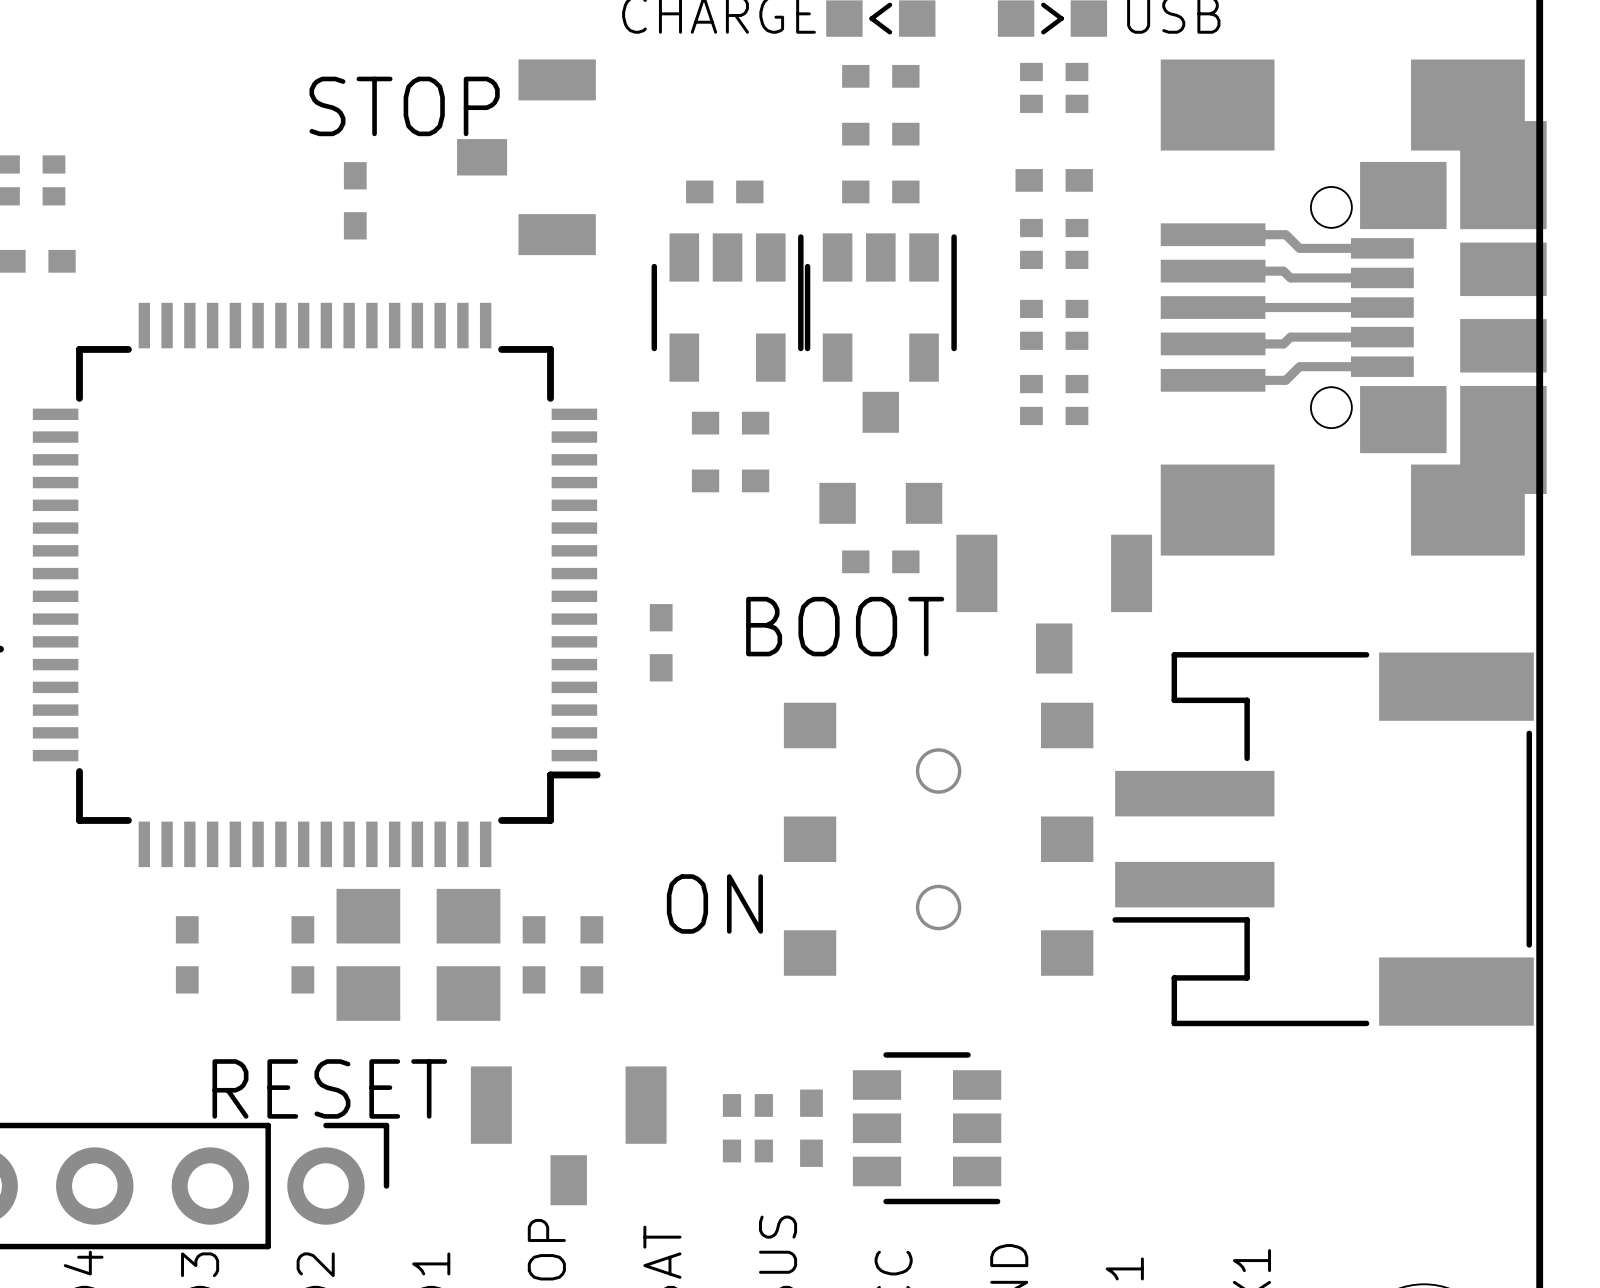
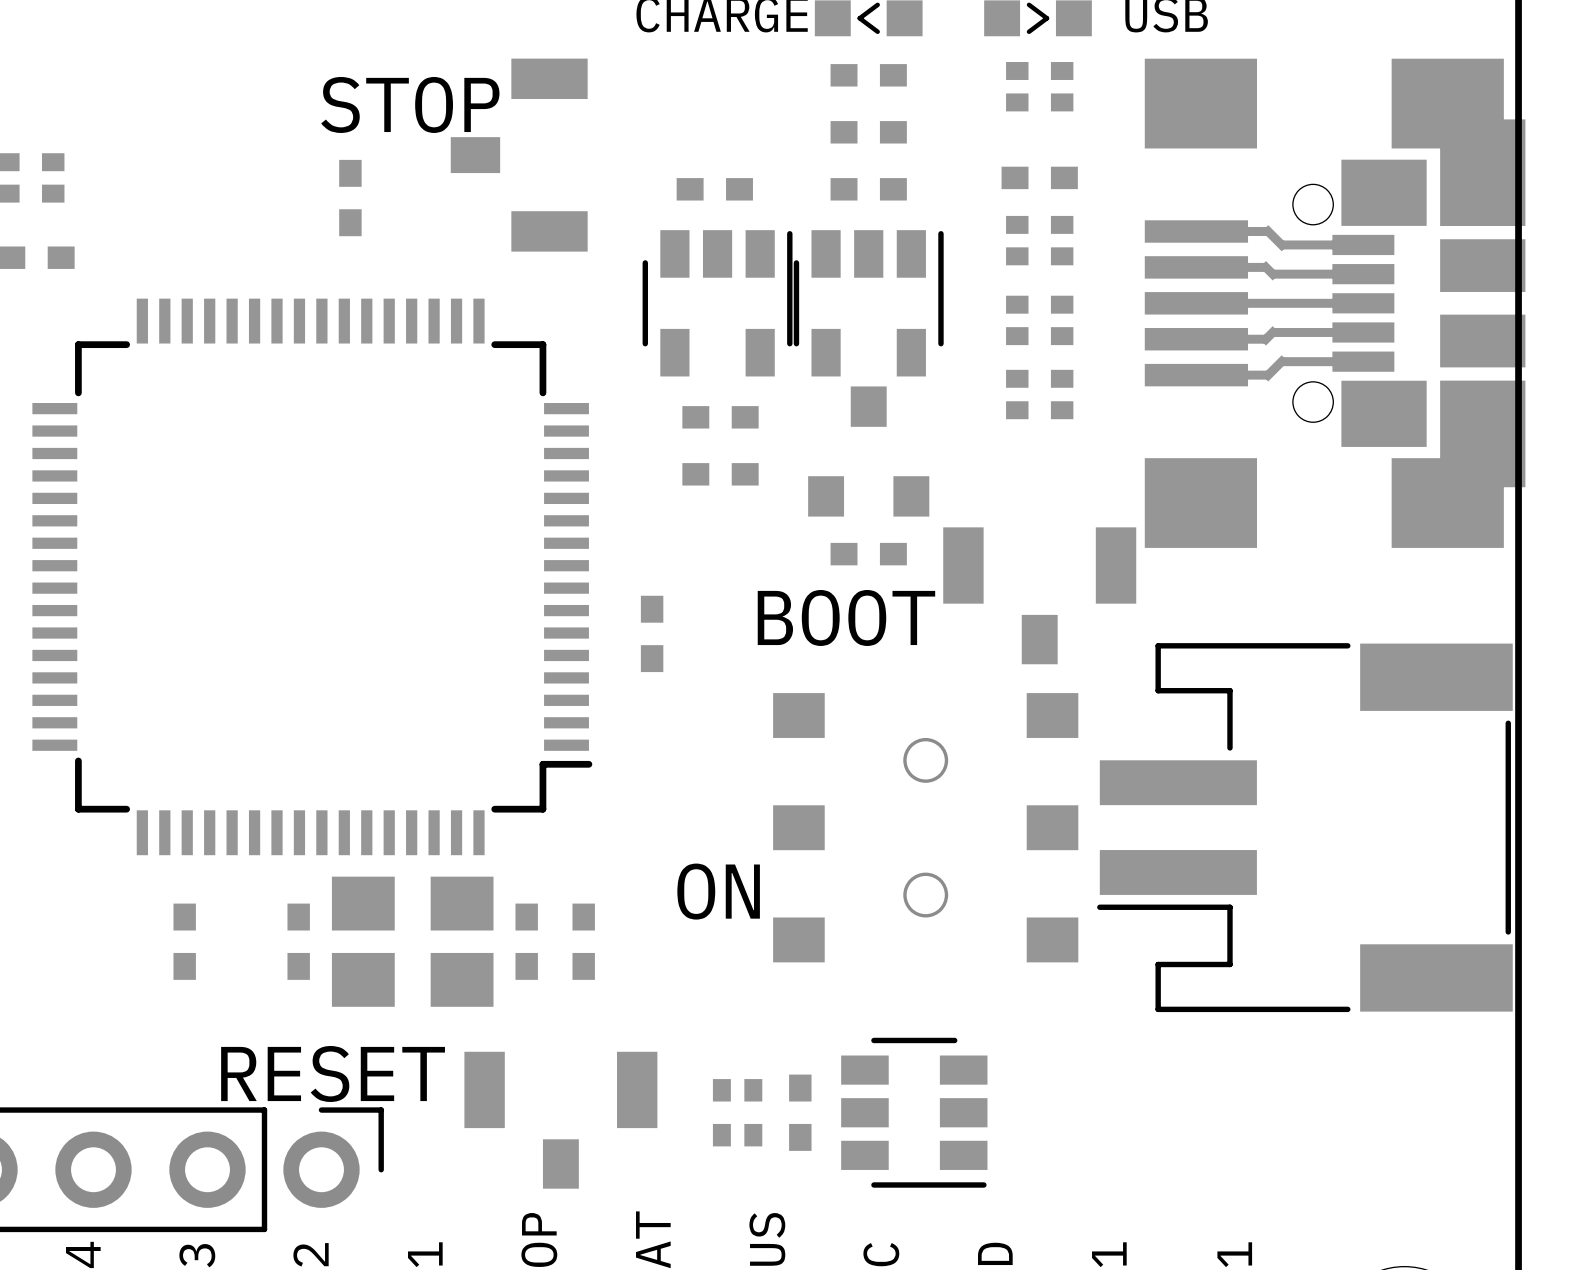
part footprint: [1160, 59, 1547, 556] -> [1144, 58, 1526, 548]

